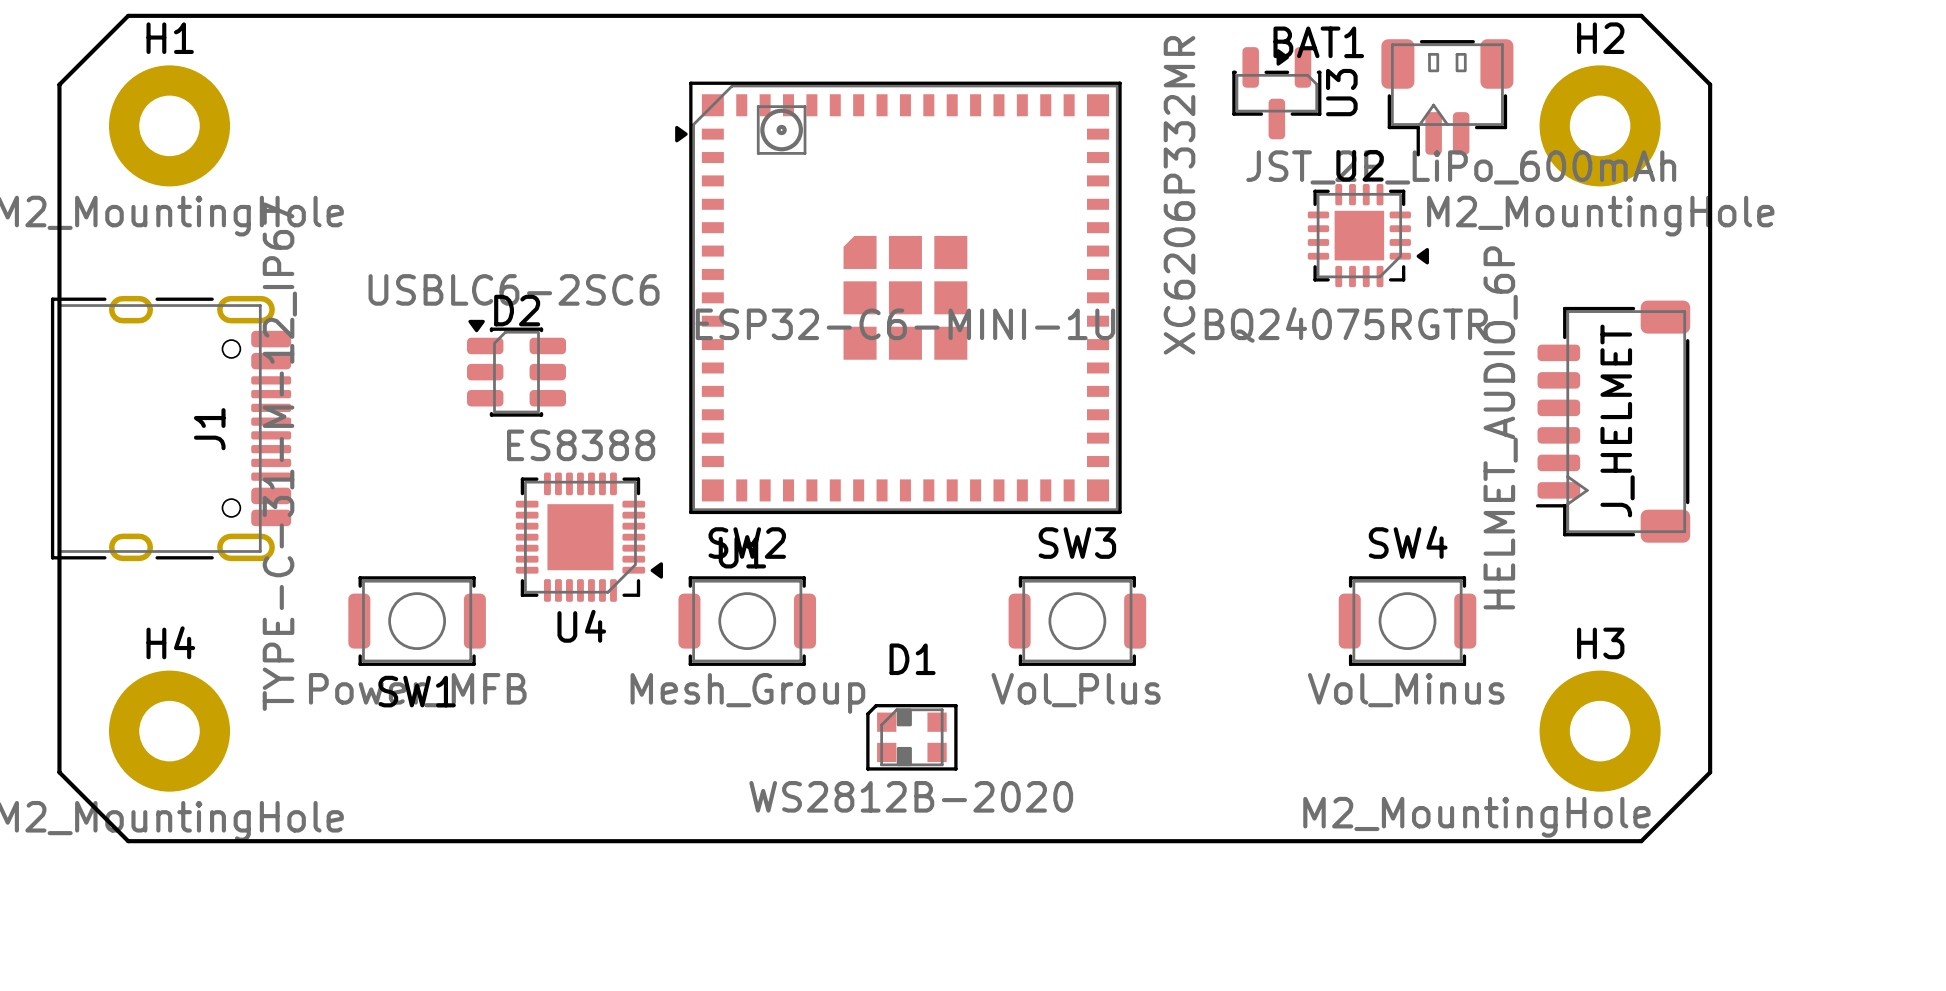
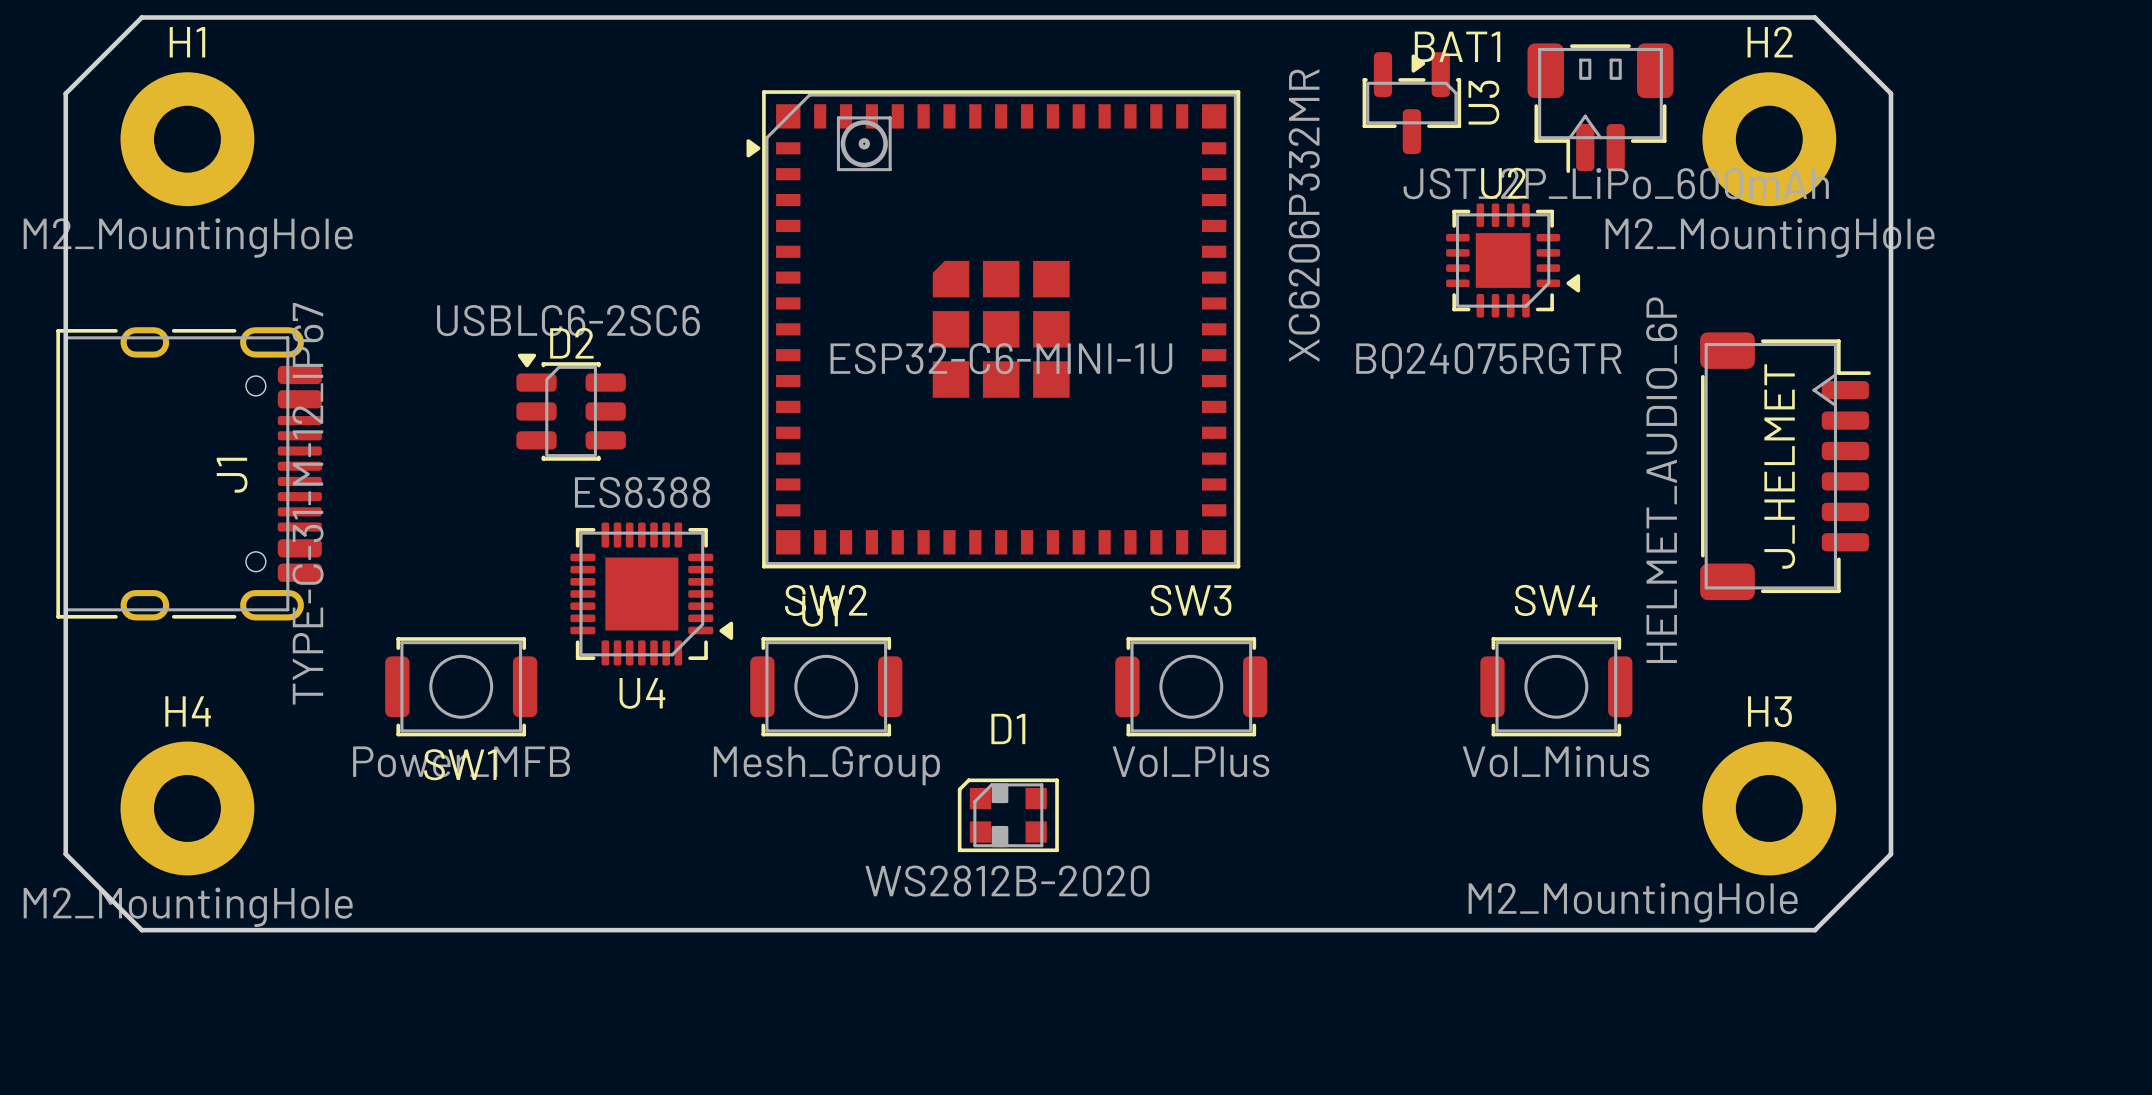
J_HELMET side: bottom (1613, 421) -> top (1785, 466)

